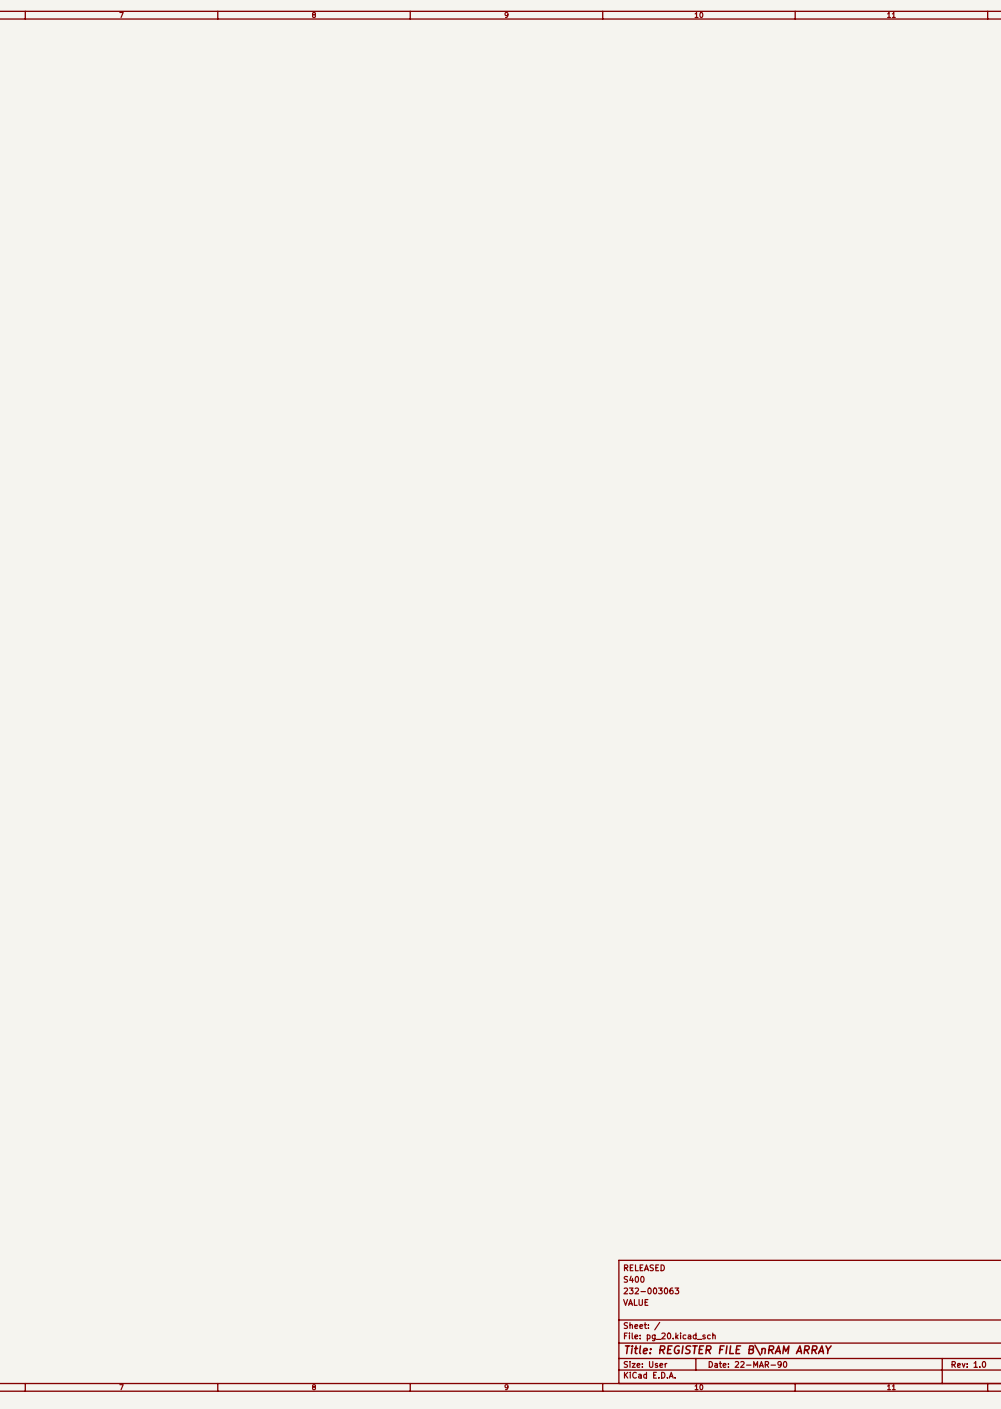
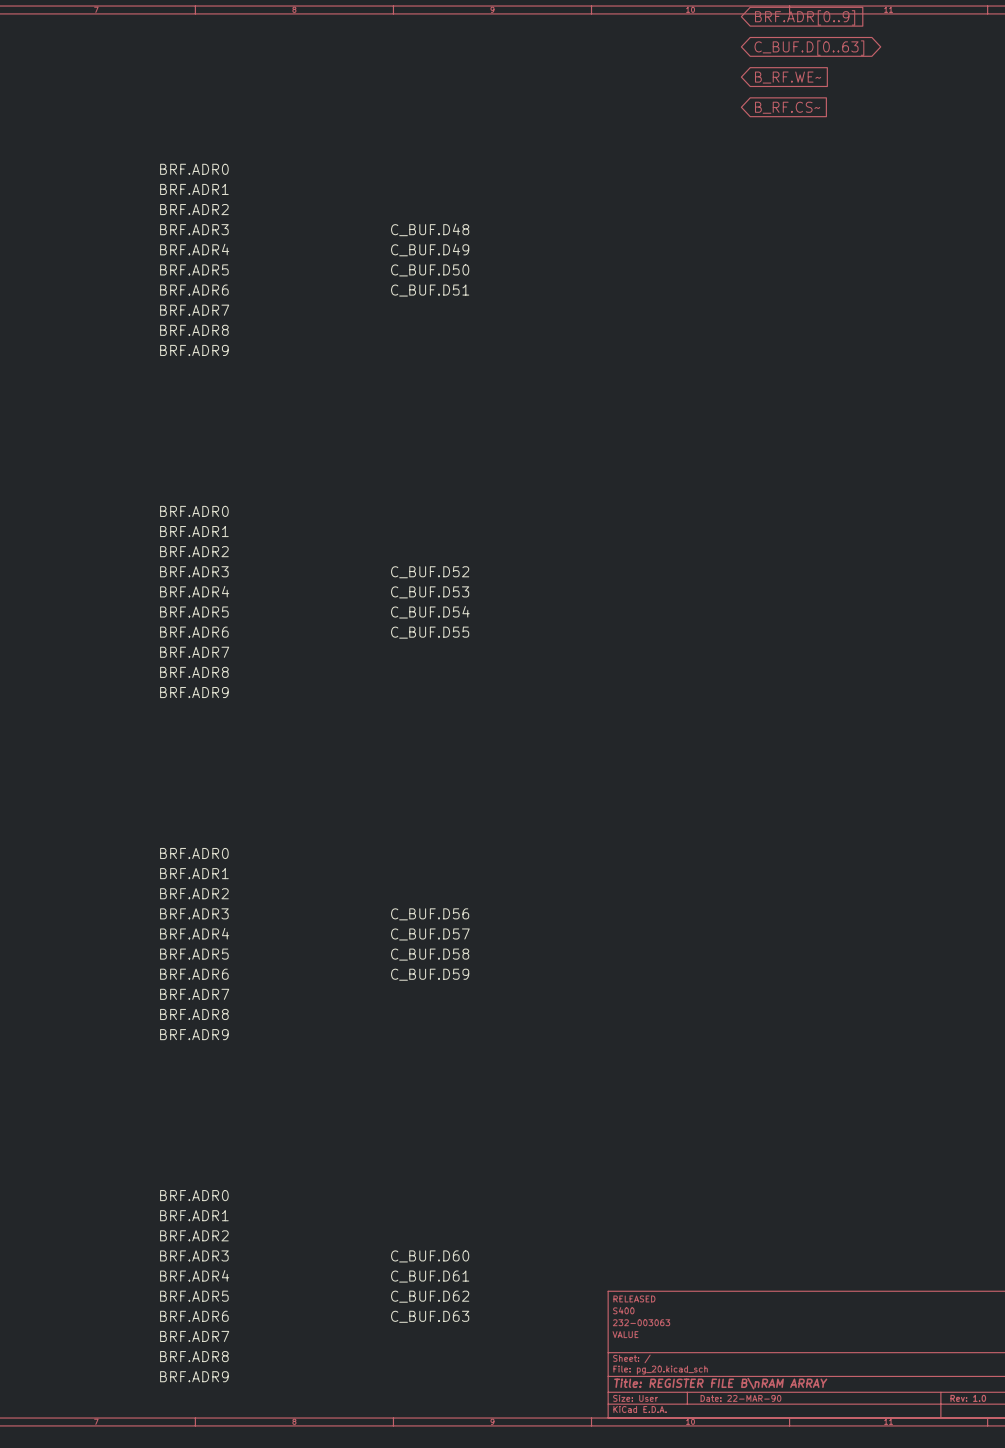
global label: none -> BRF.ADR[0..9] (805, 17)
global label: none -> C_BUF.D[0..63] (809, 48)
global label: none -> B_RF.WE~ (788, 77)
global label: none -> B_RF.CS~ (787, 107)
label: none -> BRF.ADR0 (194, 169)
label: none -> BRF.ADR1 (194, 189)
label: none -> BRF.ADR2 (194, 209)
label: none -> BRF.ADR3 (194, 229)
label: none -> C_BUF.D48 (430, 229)
label: none -> BRF.ADR4 (194, 249)
label: none -> C_BUF.D49 (430, 250)
label: none -> BRF.ADR5 (194, 269)
label: none -> C_BUF.D50 (430, 270)
label: none -> BRF.ADR6 (194, 290)
label: none -> C_BUF.D51 (430, 290)
label: none -> BRF.ADR7 (194, 310)
label: none -> BRF.ADR8 (194, 330)
label: none -> BRF.ADR9 (194, 350)
label: none -> BRF.ADR0 (194, 511)
label: none -> BRF.ADR1 (194, 531)
label: none -> BRF.ADR2 (194, 551)
label: none -> BRF.ADR3 (194, 571)
label: none -> C_BUF.D52 (430, 572)
label: none -> BRF.ADR4 (194, 591)
label: none -> C_BUF.D53 (430, 592)
label: none -> BRF.ADR5 (194, 612)
label: none -> C_BUF.D54 (430, 612)
label: none -> BRF.ADR6 (194, 632)
label: none -> C_BUF.D55 (430, 632)
label: none -> BRF.ADR7 (194, 652)
label: none -> BRF.ADR8 (194, 672)
label: none -> BRF.ADR9 (194, 692)
label: none -> BRF.ADR0 (194, 853)
label: none -> BRF.ADR1 (194, 873)
label: none -> BRF.ADR2 (194, 893)
label: none -> BRF.ADR3 (194, 913)
label: none -> C_BUF.D56 (430, 914)
label: none -> BRF.ADR4 (194, 933)
label: none -> C_BUF.D57 (430, 934)
label: none -> BRF.ADR5 (194, 954)
label: none -> C_BUF.D58 (430, 954)
label: none -> BRF.ADR6 (194, 974)
label: none -> C_BUF.D59 (430, 974)
label: none -> BRF.ADR7 (194, 994)
label: none -> BRF.ADR8 (194, 1014)
label: none -> BRF.ADR9 (194, 1034)
label: none -> BRF.ADR0 (194, 1195)
label: none -> BRF.ADR1 (194, 1215)
label: none -> BRF.ADR2 (194, 1235)
label: none -> BRF.ADR3 (194, 1255)
label: none -> C_BUF.D60 (430, 1256)
label: none -> BRF.ADR4 (194, 1275)
label: none -> C_BUF.D61 (430, 1276)
label: none -> BRF.ADR5 (194, 1296)
label: none -> C_BUF.D62 (430, 1296)
label: none -> BRF.ADR6 (194, 1316)
label: none -> C_BUF.D63 (430, 1316)
label: none -> BRF.ADR7 (194, 1336)
label: none -> BRF.ADR8 (194, 1356)
label: none -> BRF.ADR9 (194, 1376)

